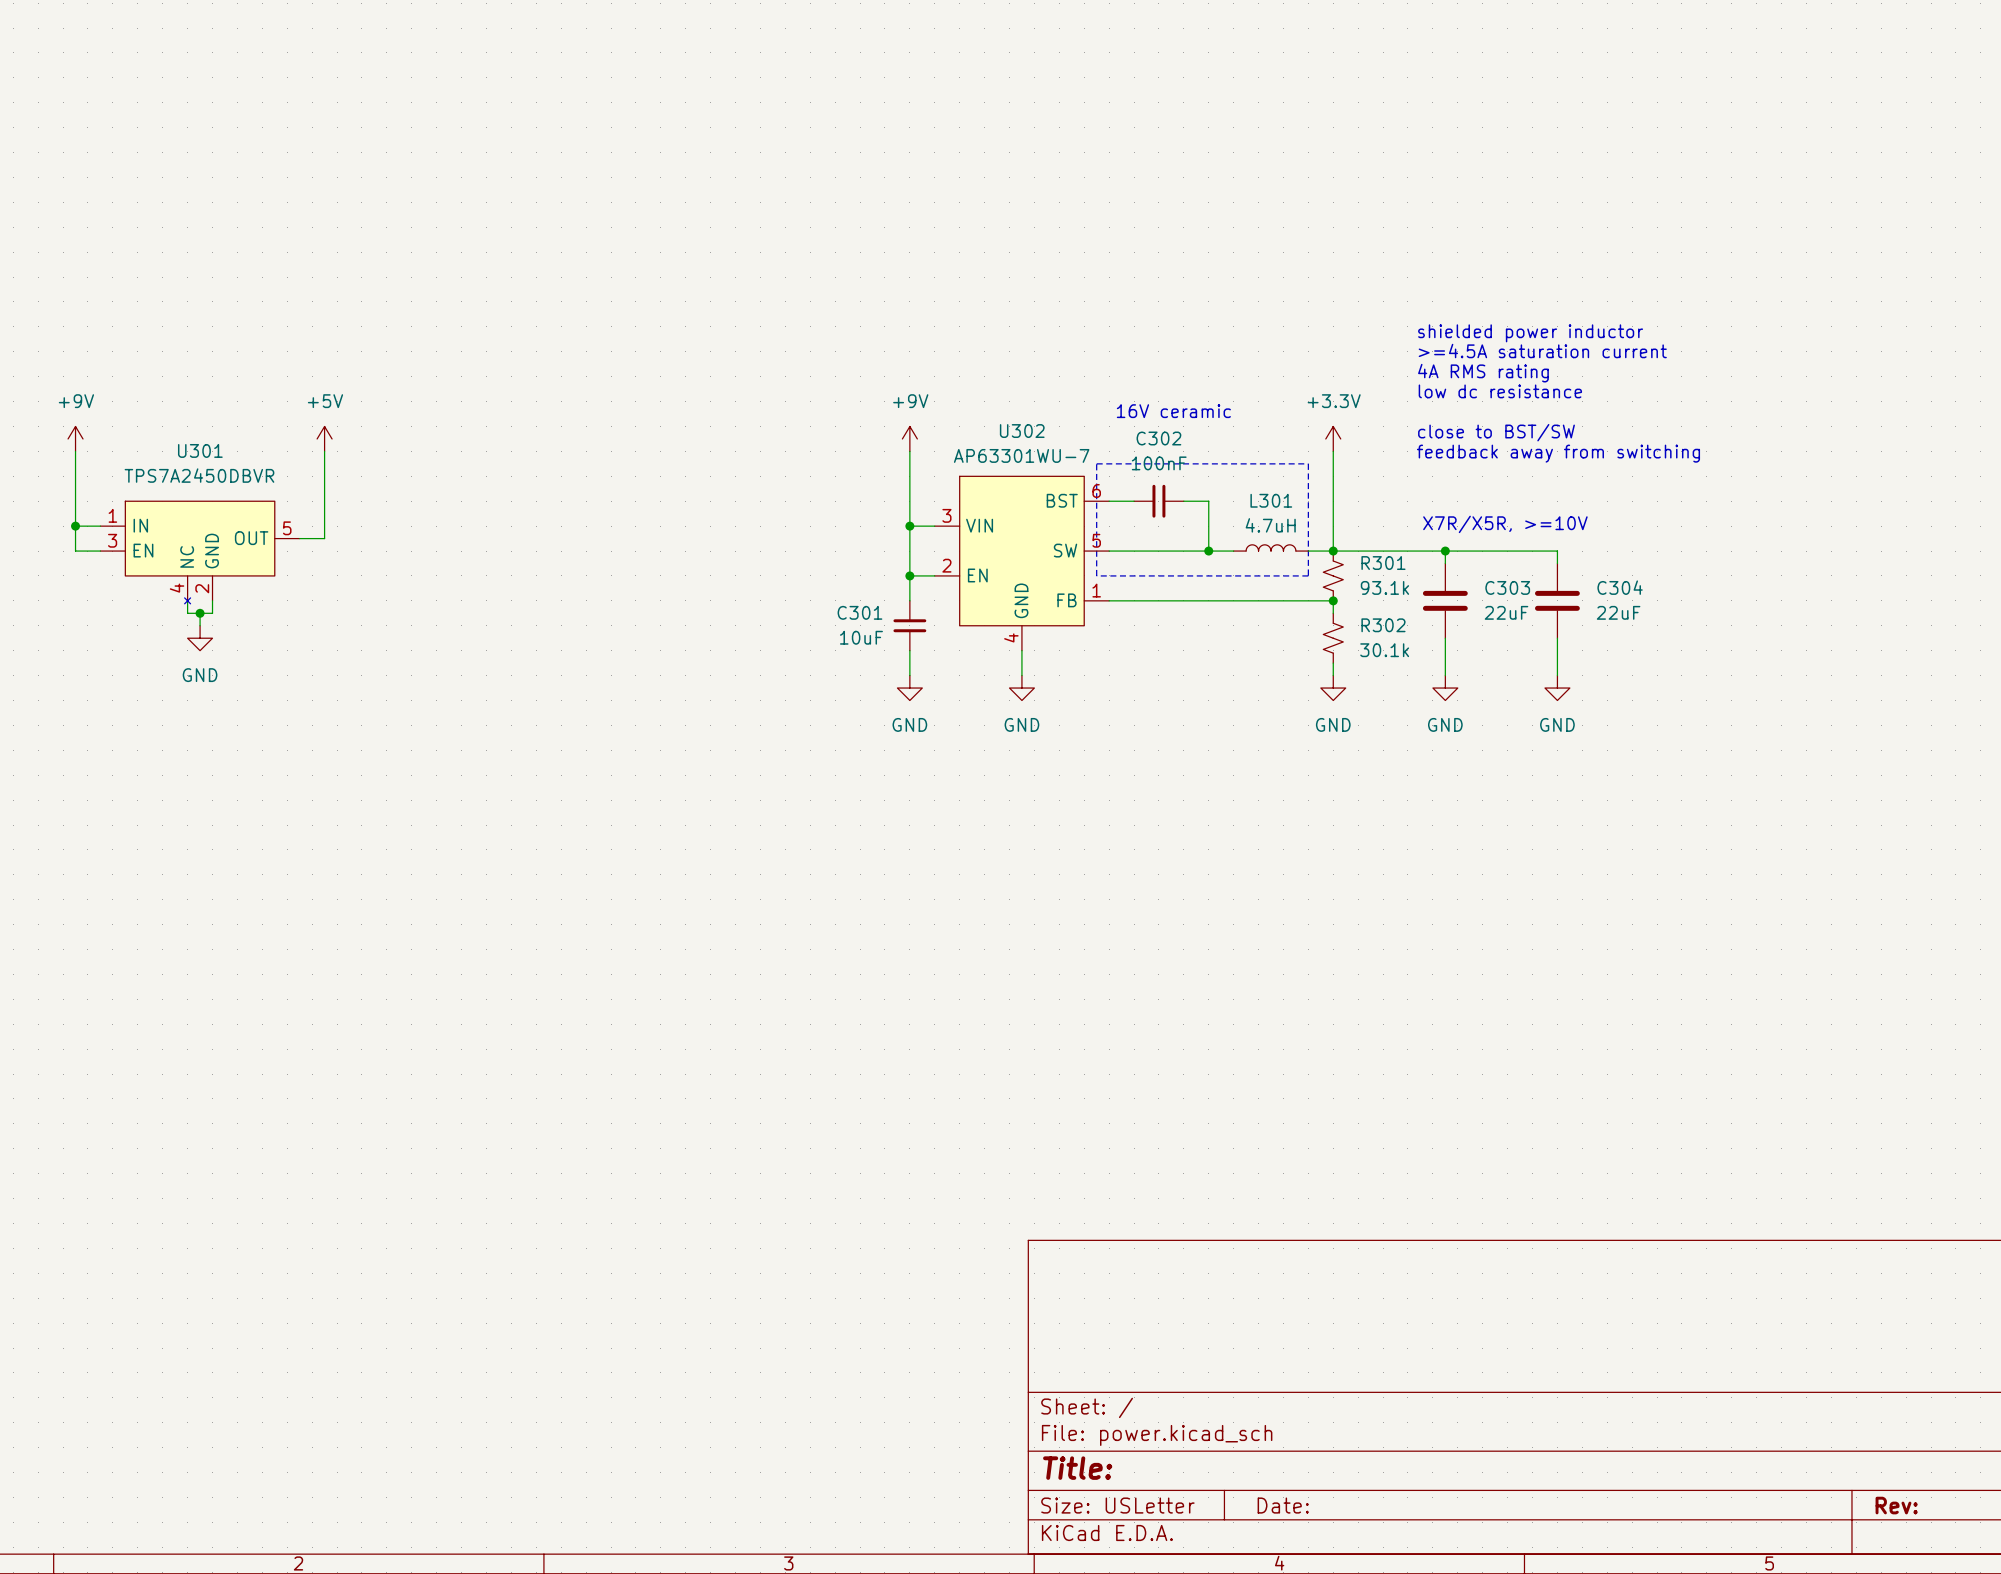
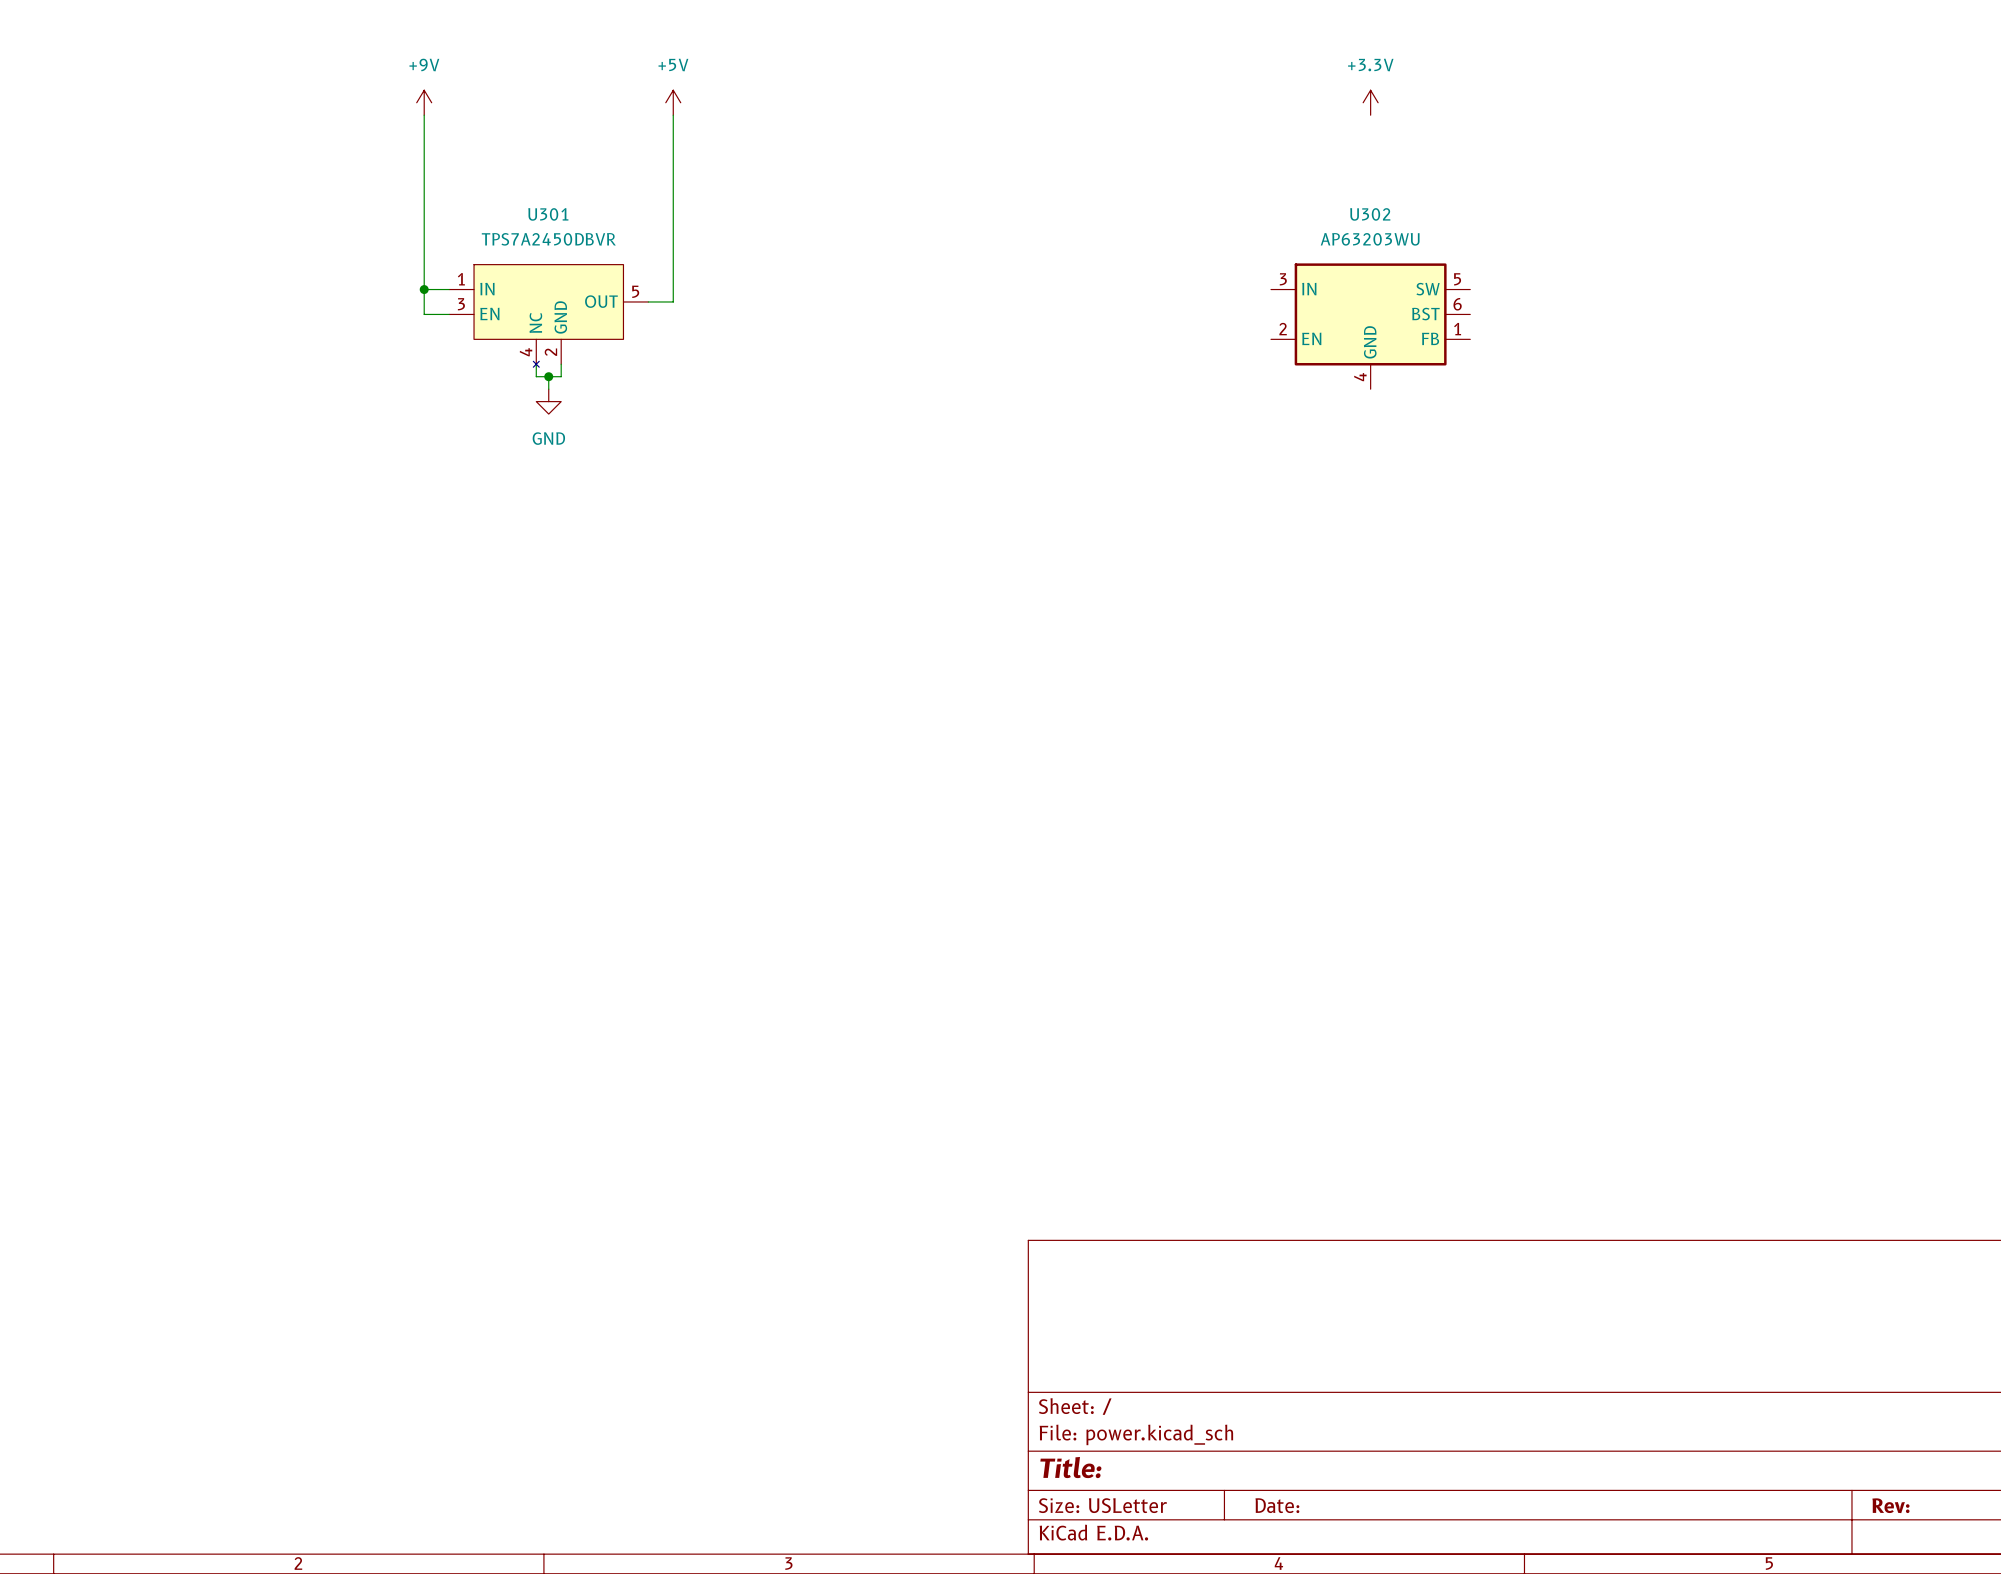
power symbol: none -> +9V (424, 102)
power symbol: none -> +5V (673, 102)
power symbol: none -> +3.3V (1370, 102)
wire: none -> (424, 115) (424, 314) (449, 314)
wire: none -> (673, 115) (673, 301) (648, 301)
wire: none -> (424, 289) (449, 289)
junction: none -> (424, 289)
text: shielded power inductor (1530, 333) -> none
text: >=4.5A saturation current (1542, 351) -> none
wire: none -> (536, 364) (536, 376) (561, 376) (561, 364)
text: 4A RMS rating (1483, 373) -> none
wire: none -> (548, 376) (548, 389)
junction: none -> (548, 376)
text: low dc resistance (1500, 391) -> none
power symbol: none -> GND (548, 401)
text: 16V ceramic (1173, 411) -> none
U302 name position: U302 (1022, 431) -> U302 (1370, 214)
text: close to BST/SW (1496, 432) -> none
power symbol: +9V (75, 438) -> none
power symbol: +5V (324, 438) -> none
power symbol: +9V (909, 438) -> none
power symbol: +3.3V (1333, 438) -> none
wire: (75, 451) (75, 551) (100, 551) -> none
wire: (324, 451) (324, 538) (299, 538) -> none
wire: (909, 451) (909, 600) -> none
wire: (1333, 451) (1333, 551) -> none
text: feedback away from switching (1558, 453) -> none
U302 value: AP63301WU-7 (1021, 455) -> AP63203WU (1370, 239)
line: (1096, 463) (1308, 463) (1308, 575) (1096, 575) (1096, 463) -> none
U302 symbol: [934, 476, 1110, 651] -> [1271, 263, 1471, 390]
wire: (1109, 501) (1134, 501) -> none
C302: 100nF (1158, 501) -> none
wire: (1183, 501) (1208, 501) (1208, 551) -> none
text: X7R/X5R, >=10V (1505, 524) -> none
wire: (75, 526) (100, 526) -> none
junction: (75, 526) -> none
wire: (909, 526) (934, 526) -> none
junction: (909, 526) -> none
L301: 4.7uH (1271, 547) -> none
wire: (1109, 551) (1233, 551) -> none
junction: (1208, 551) -> none
wire: (1308, 551) (1557, 551) (1557, 563) -> none
junction: (1333, 551) -> none
wire: (1445, 551) (1445, 563) -> none
junction: (1445, 551) -> none
U301 position: (200, 552) -> (548, 315)
wire: (909, 575) (934, 575) -> none
junction: (909, 575) -> none
R301: 93.1k (1333, 575) -> none
wire: (187, 600) (187, 613) (212, 613) (212, 600) -> none
wire: (1109, 600) (1333, 600) (1333, 613) -> none
junction: (1333, 600) -> none
C303: 22uF (1445, 600) -> none
C304: 22uF (1557, 600) -> none
wire: (200, 613) (200, 625) -> none
junction: (200, 613) -> none
C301: 10uF (909, 625) -> none
power symbol: GND (200, 638) -> none
R302: 30.1k (1333, 638) -> none
wire: (1445, 638) (1445, 675) -> none
wire: (1557, 638) (1557, 675) -> none
wire: (909, 650) (909, 675) -> none
wire: (1021, 650) (1021, 675) -> none
wire: (1333, 663) (1333, 675) -> none
power symbol: GND (909, 688) -> none
power symbol: GND (1021, 688) -> none
power symbol: GND (1333, 688) -> none
power symbol: GND (1445, 688) -> none
power symbol: GND (1557, 688) -> none

